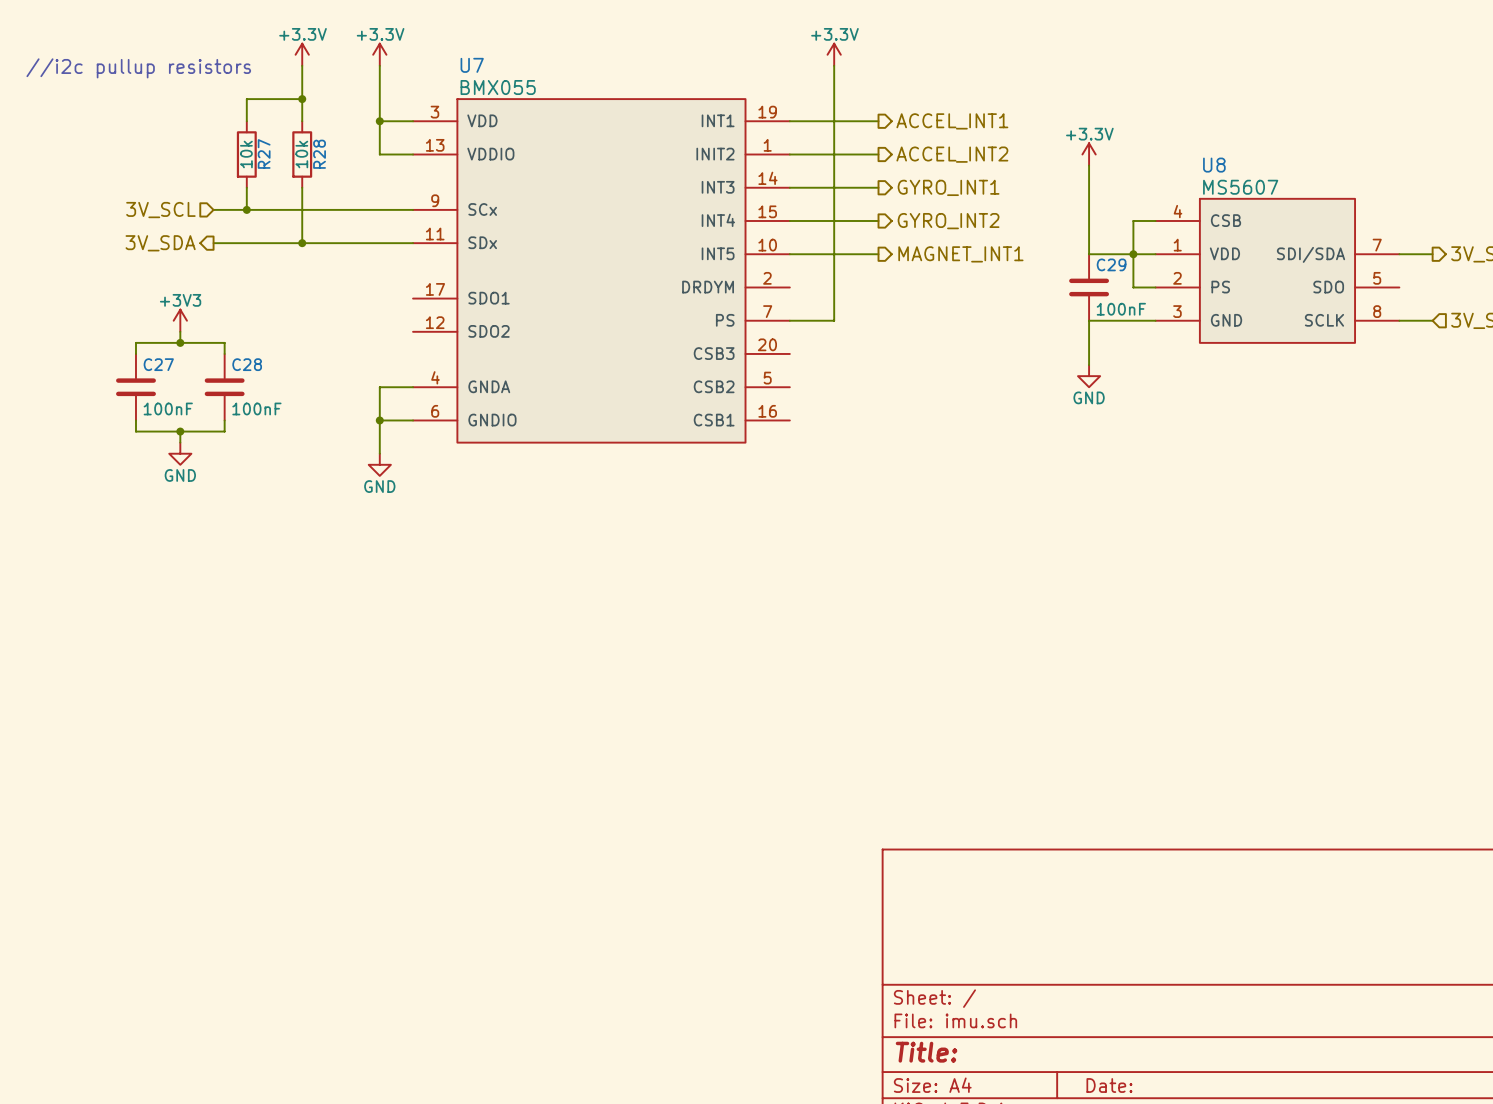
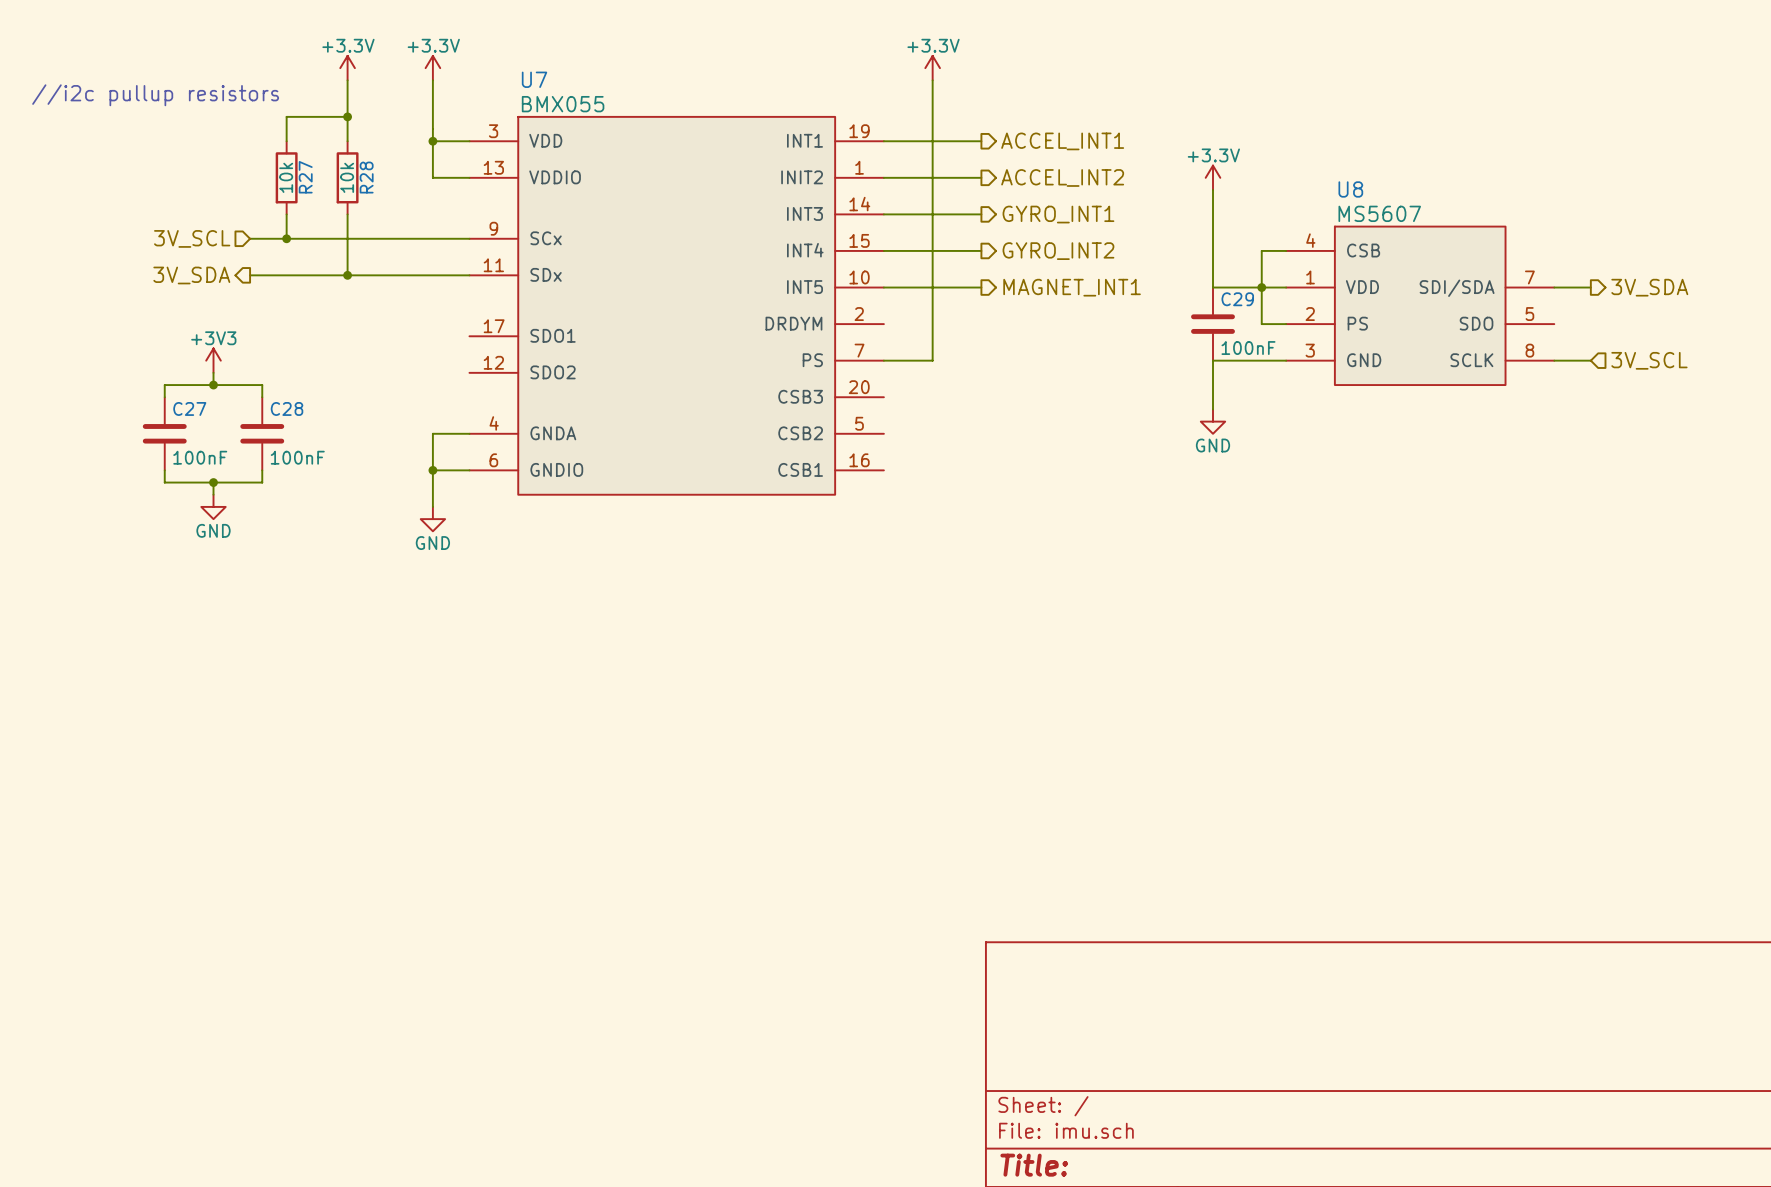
text position: //i2c pullup resistors (138, 68) -> //i2c pullup resistors (155, 95)

